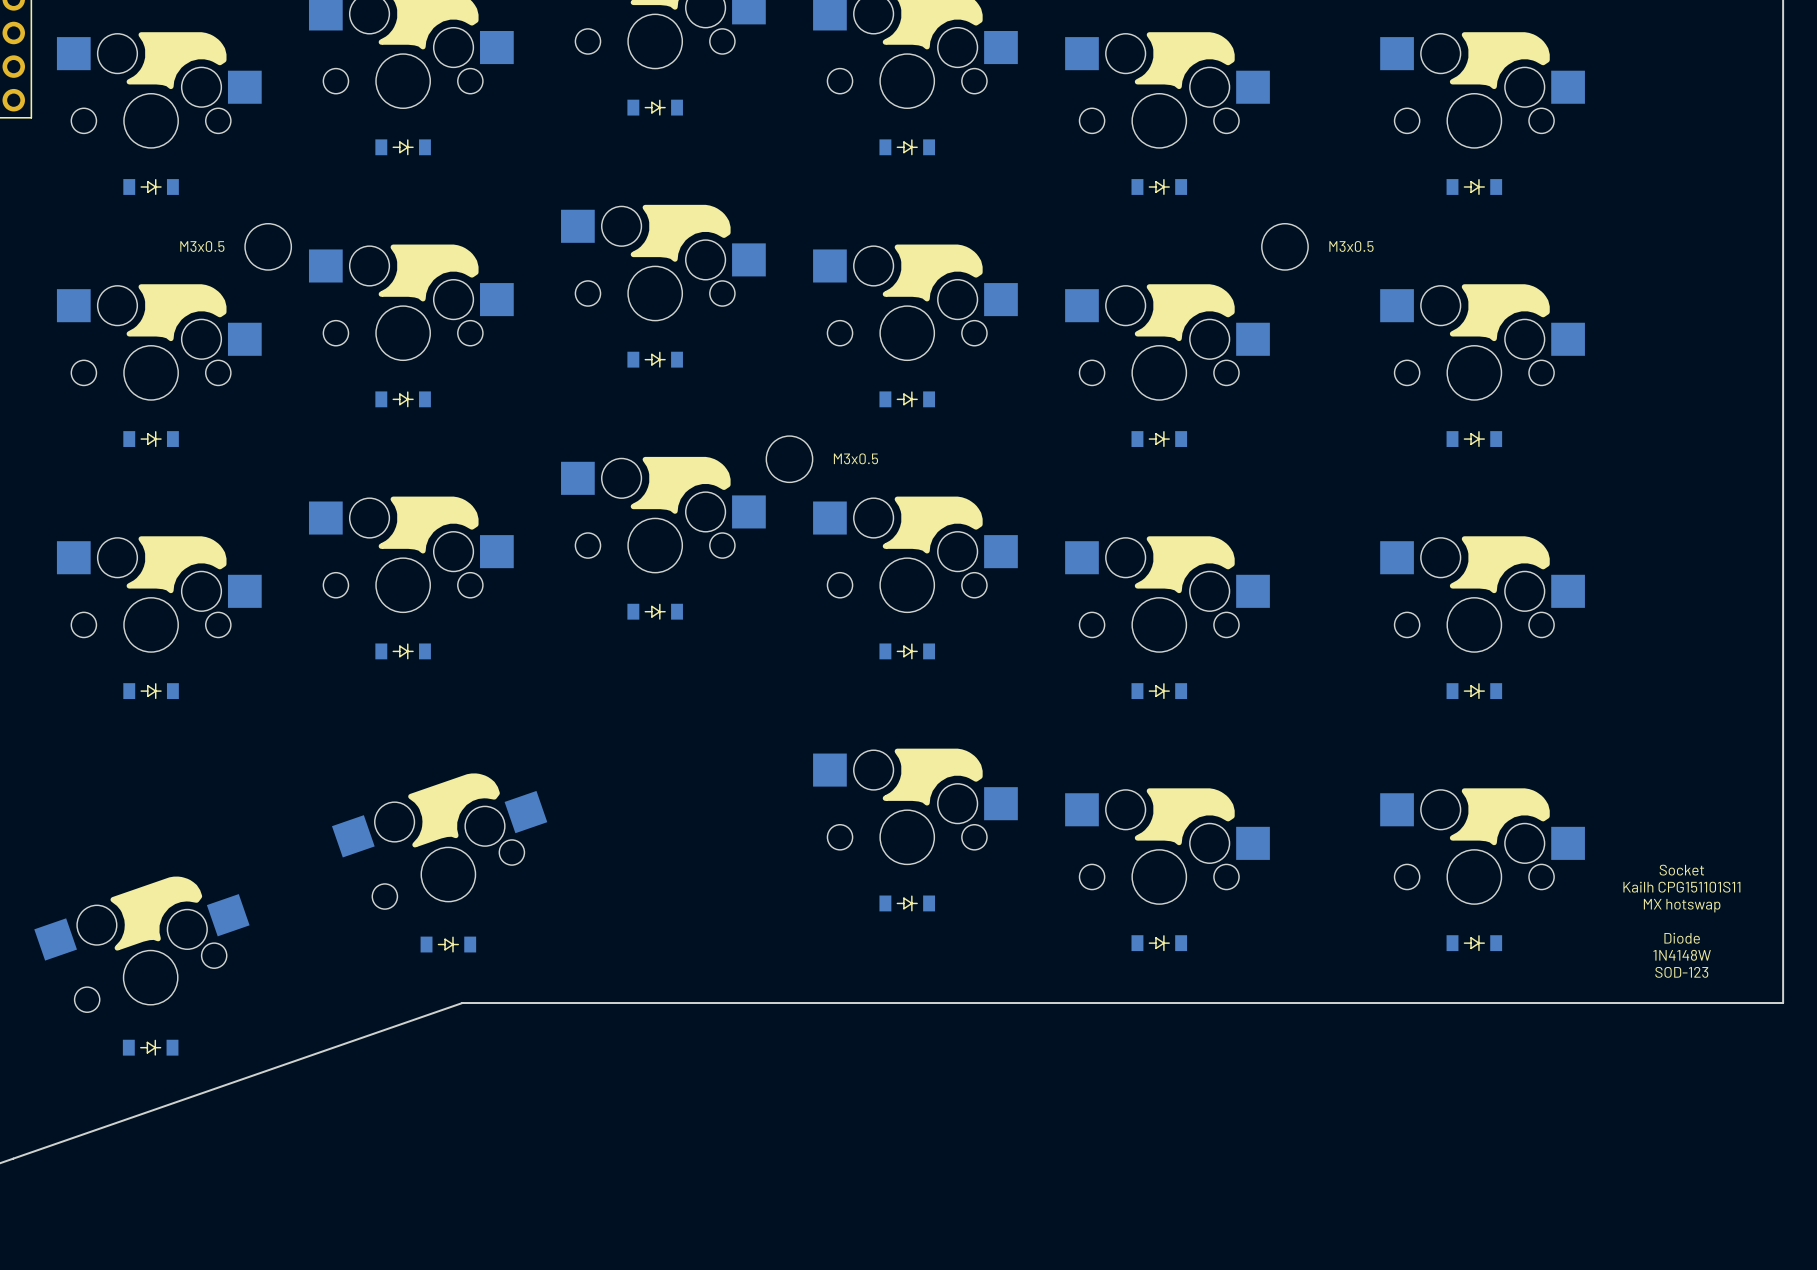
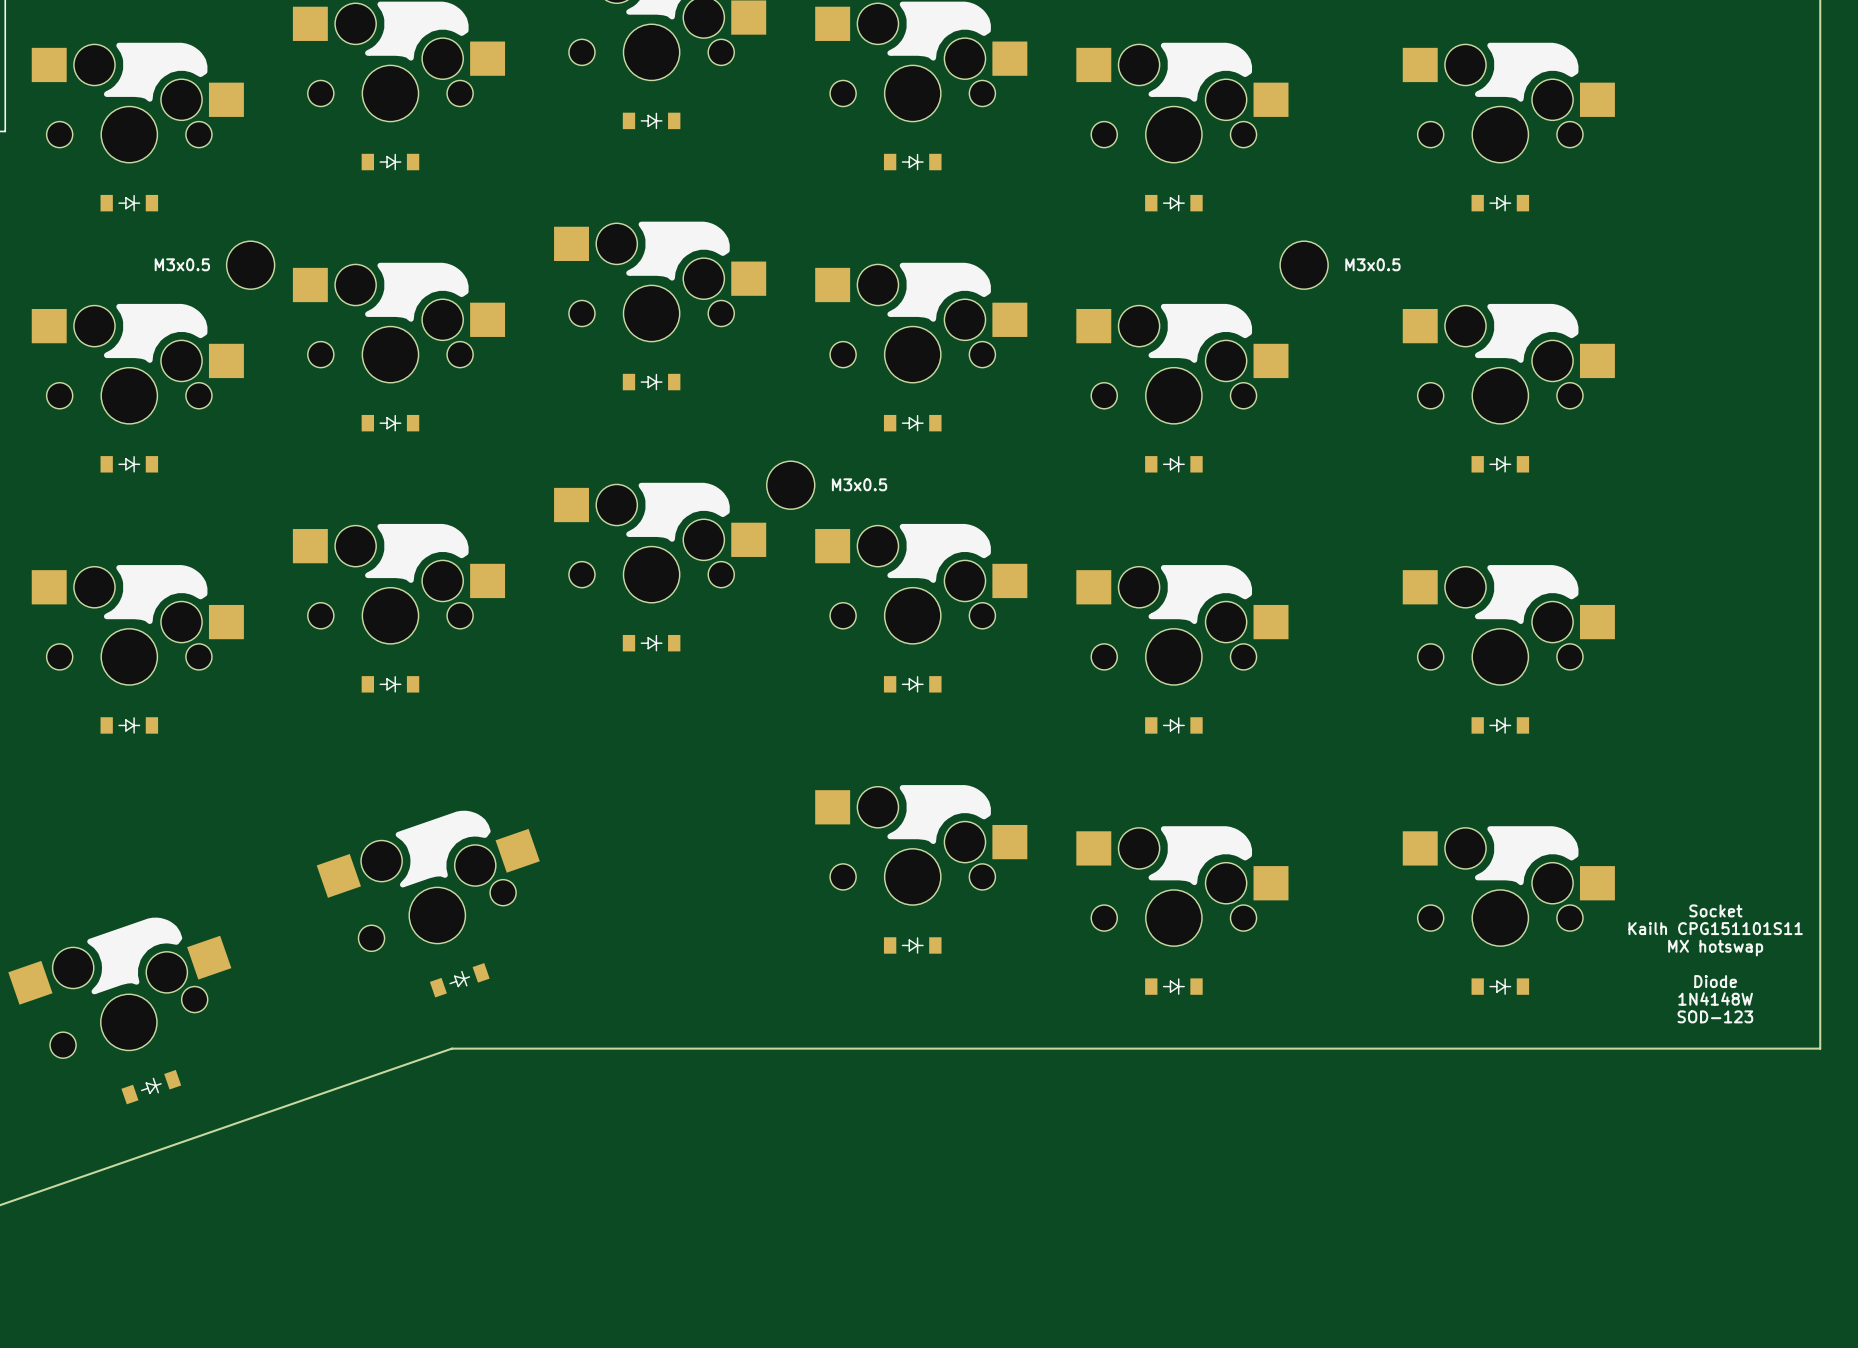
part: none -> (459, 980)
part: (448, 944) -> none
part: none -> (151, 1087)
part: (150, 1047) -> none

